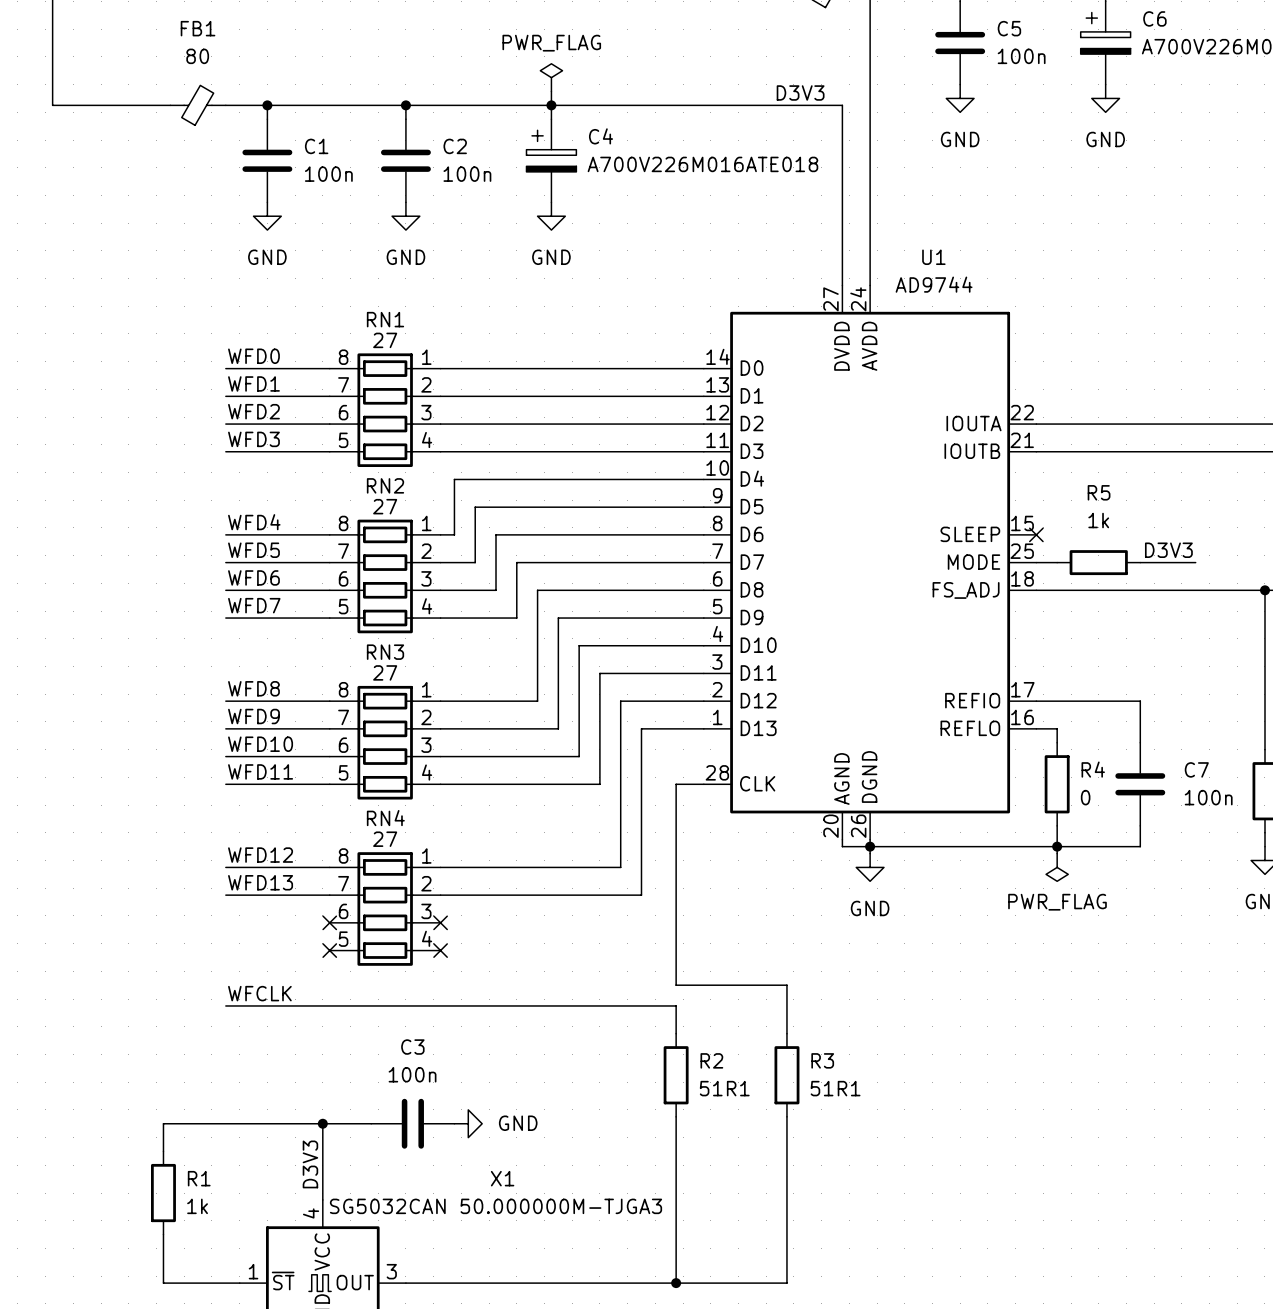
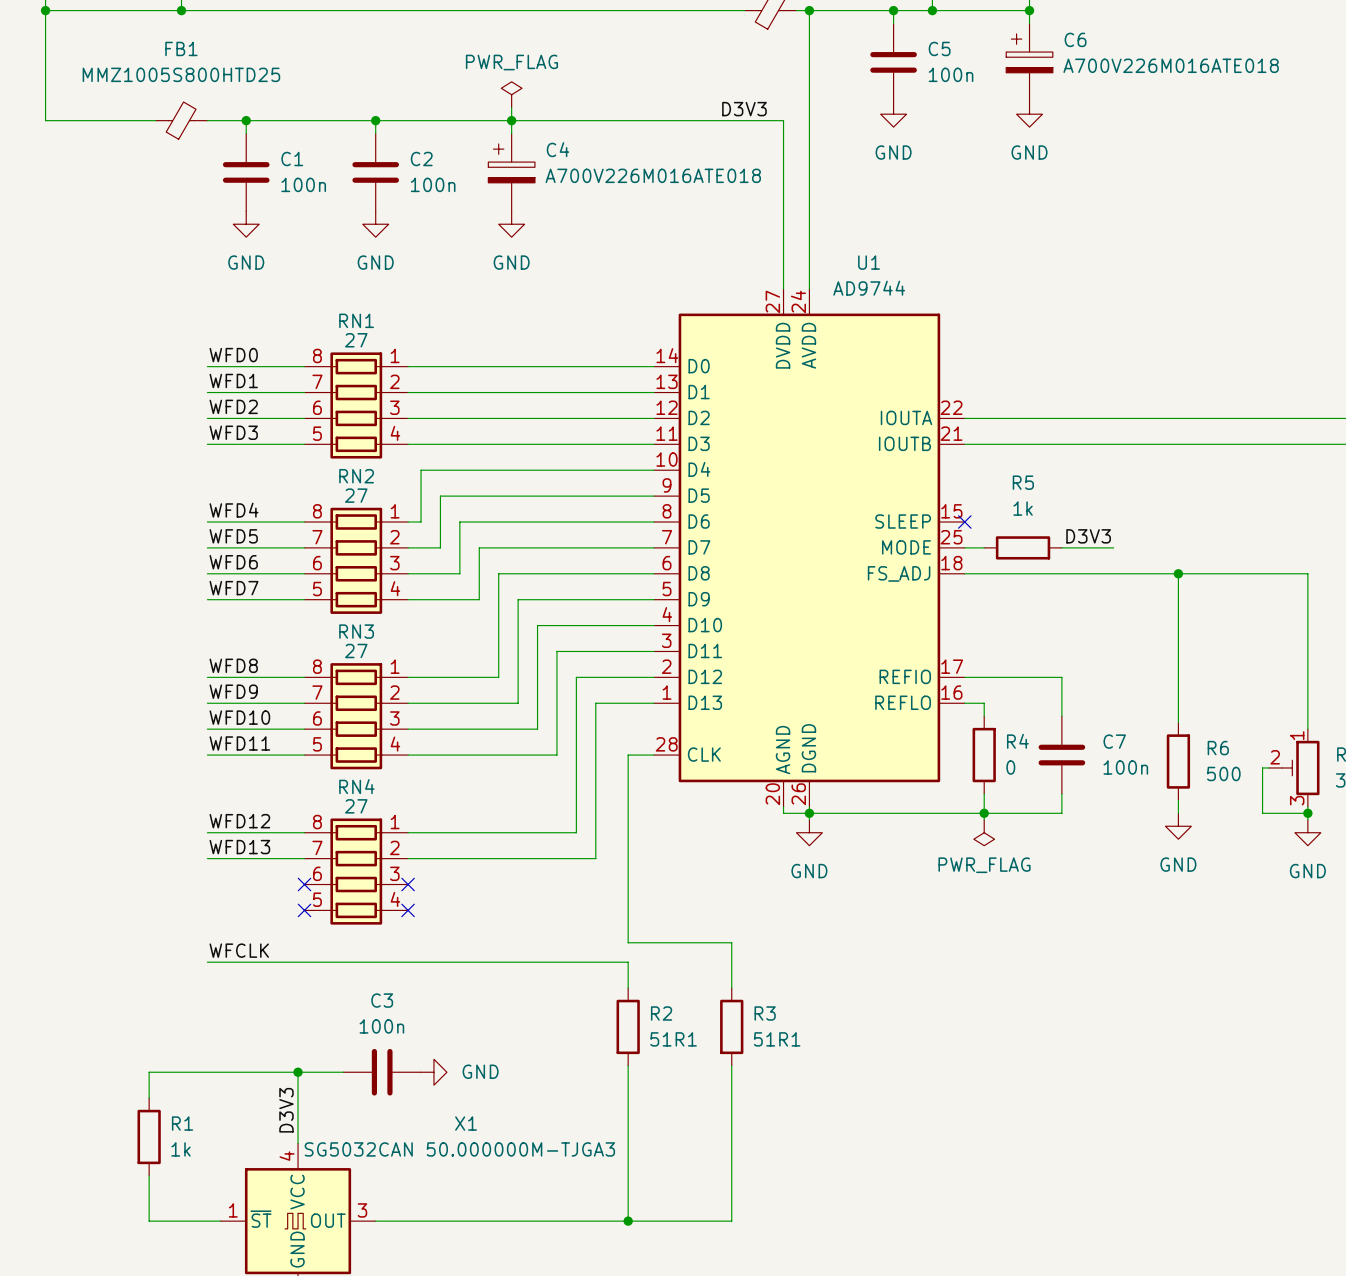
FB1 value: 80 (197, 56) -> MMZ1005S800HTD25 (181, 74)

